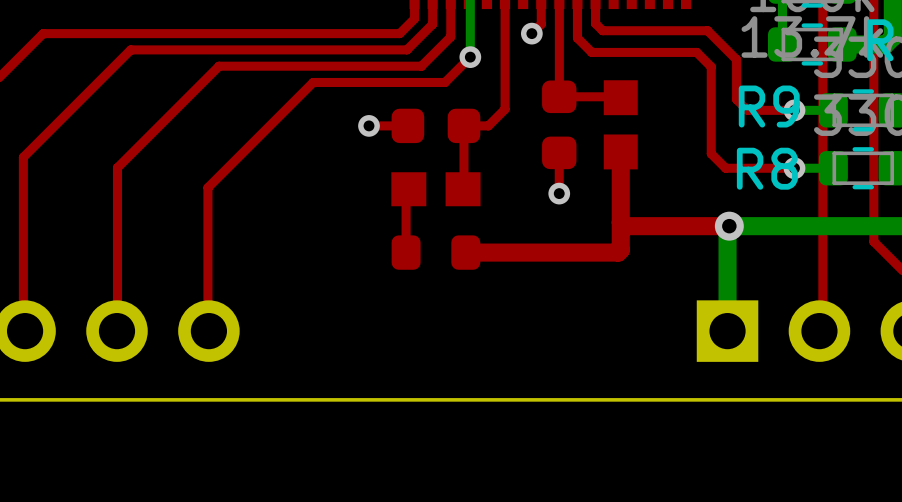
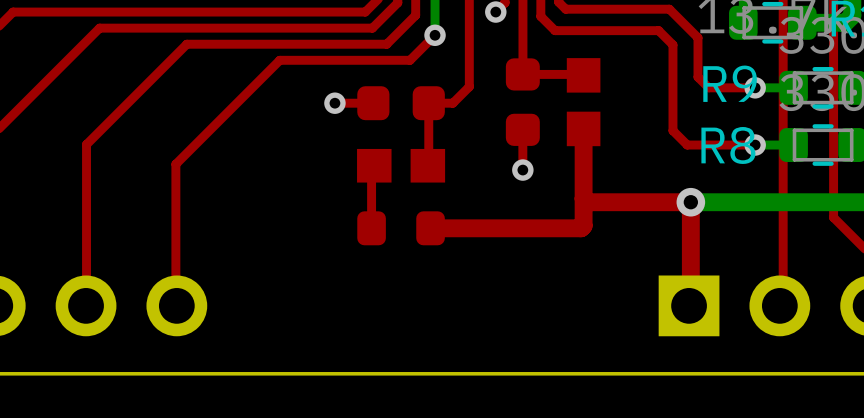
top track: none -> (690, 202) (690, 304) (689, 305)
bottom track: (727, 227) (727, 331) -> none

